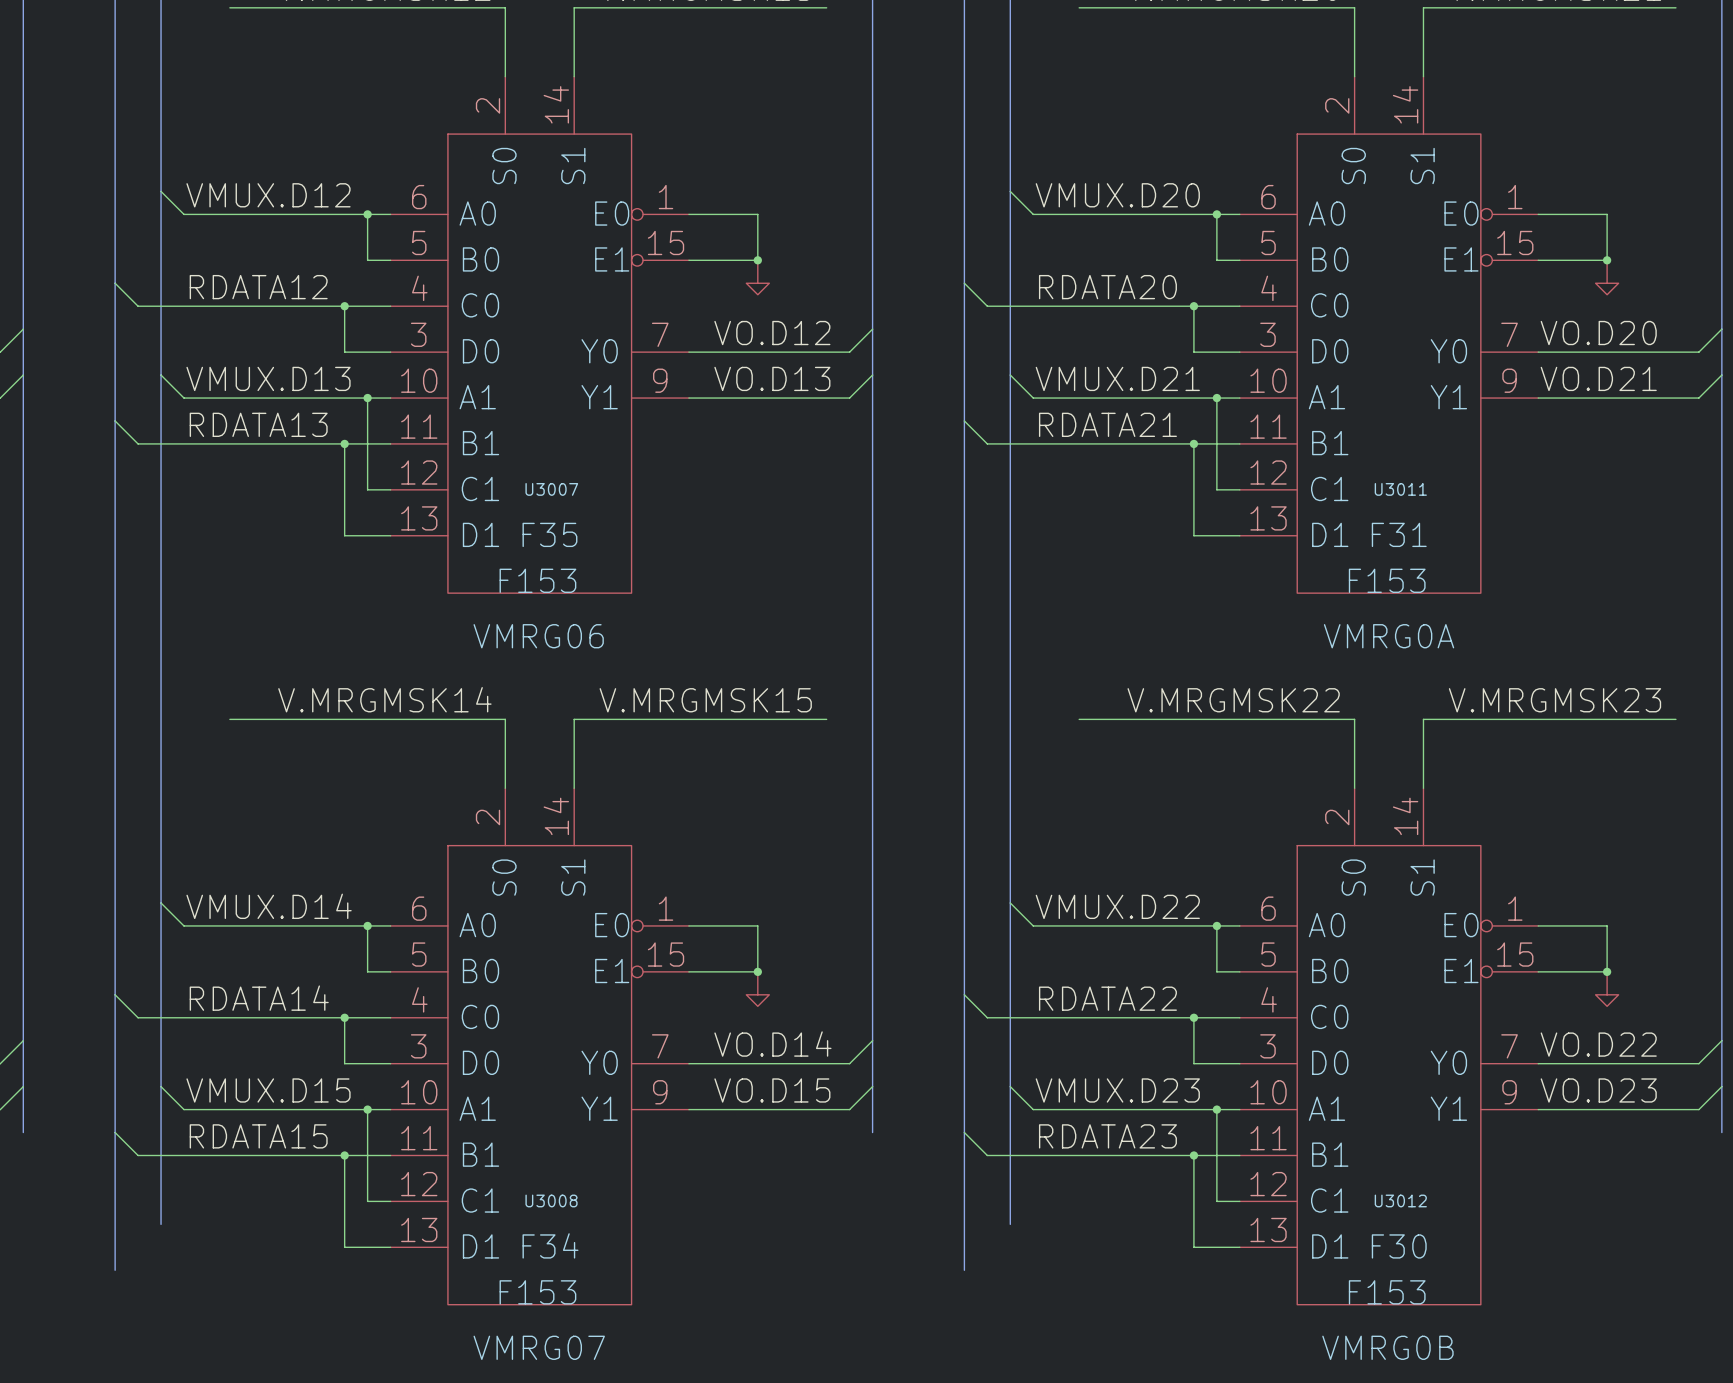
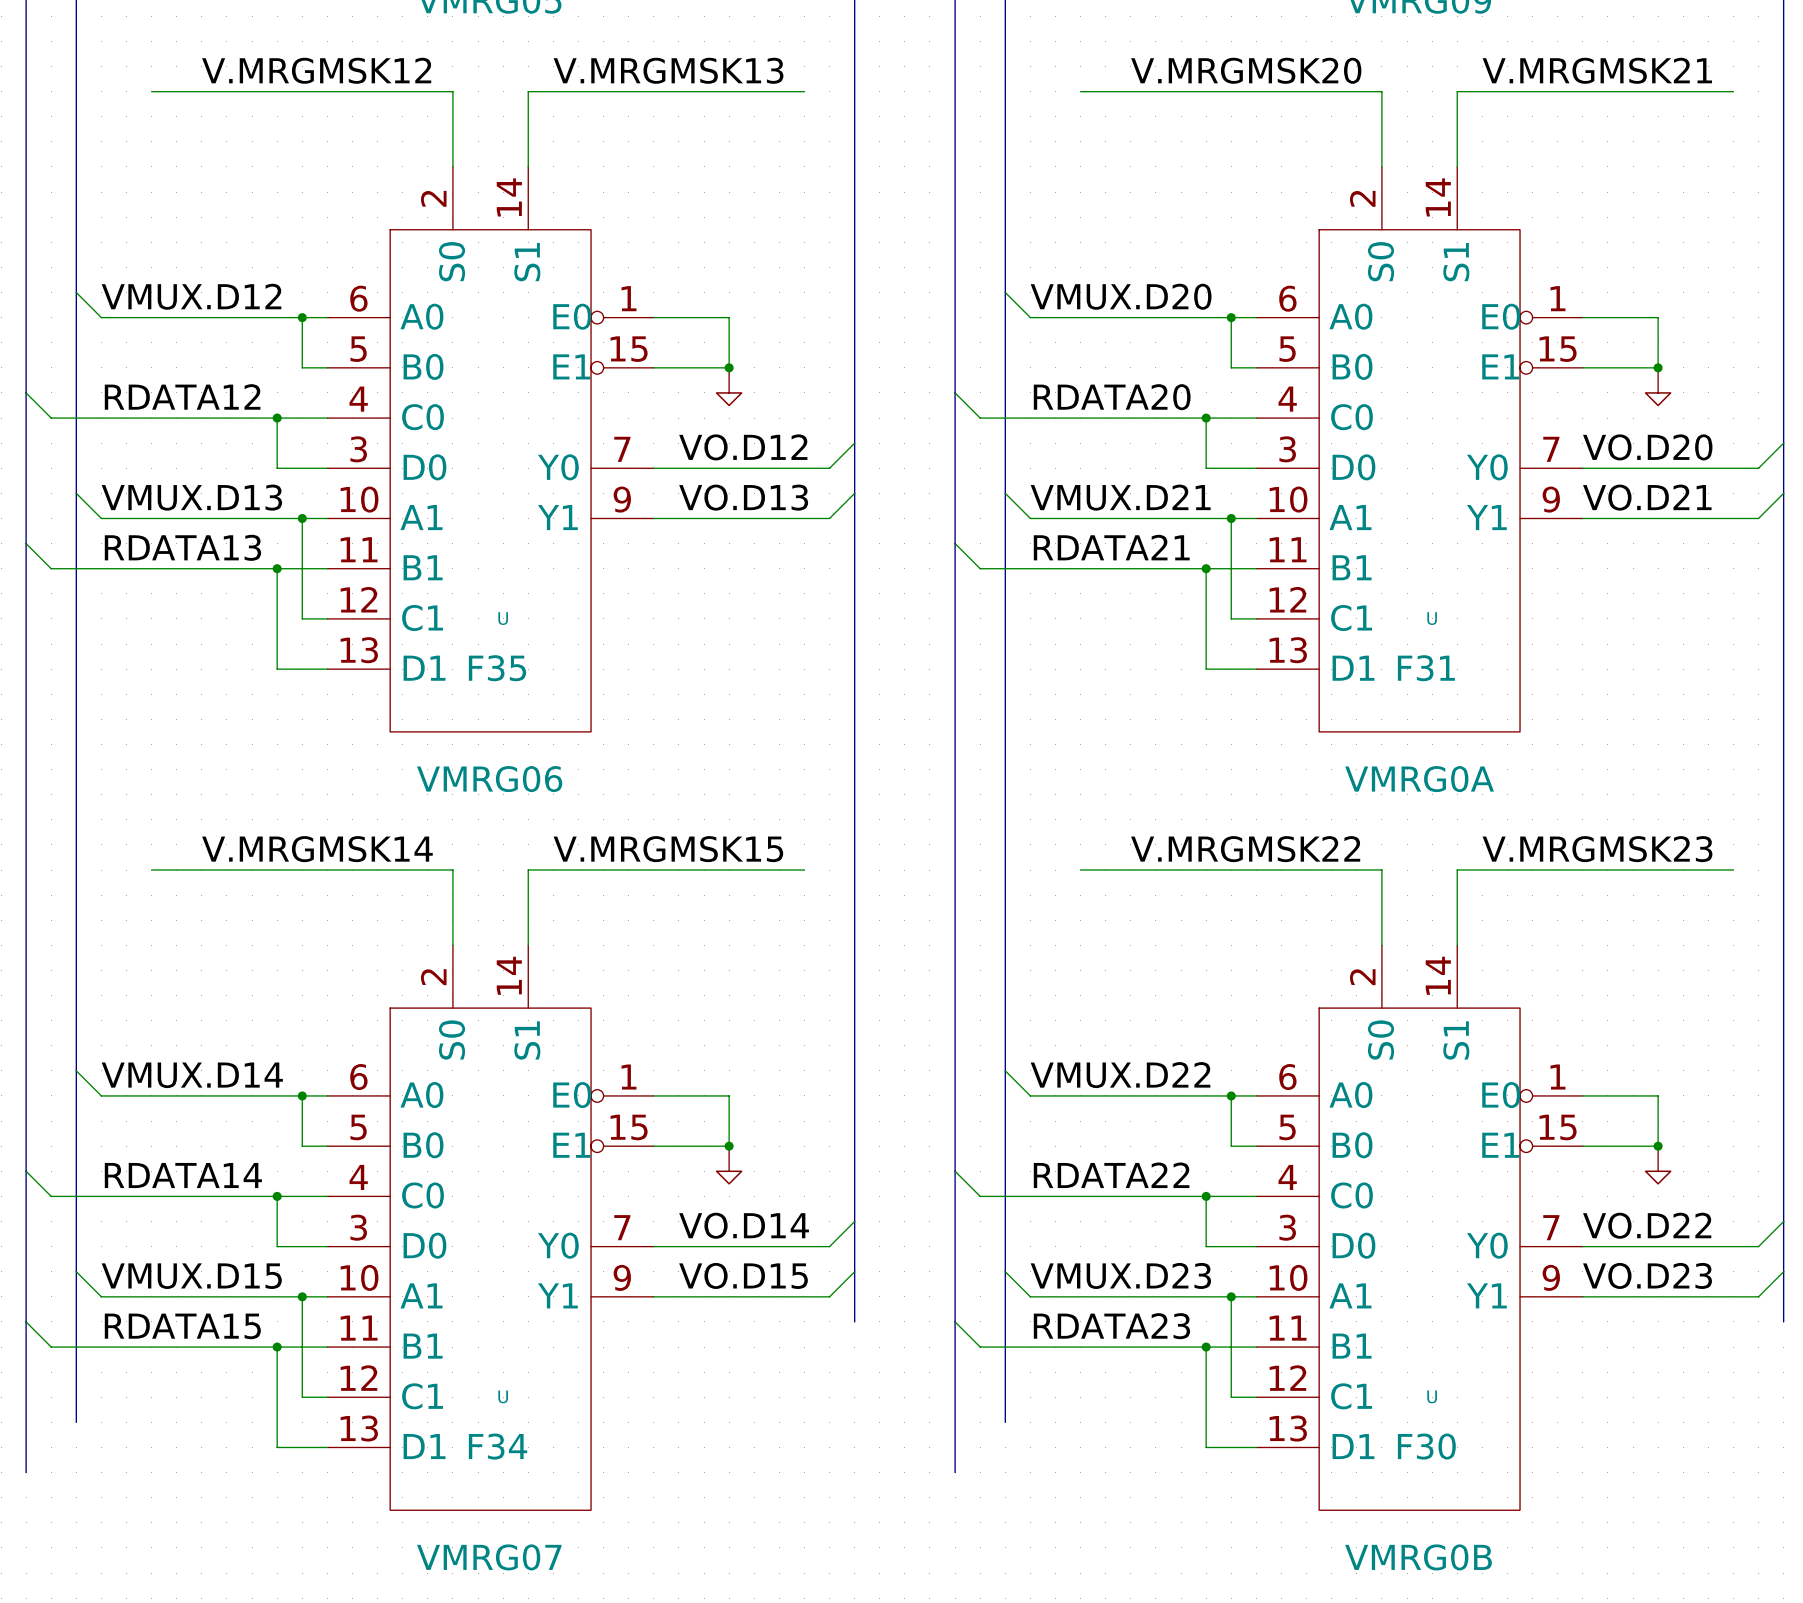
U3007 name: U3007 (551, 489) -> U (503, 618)
U3011 name: U3011 (1400, 489) -> U (1432, 618)
U3007 value: F153 (537, 580) -> none
U3011 value: F153 (1387, 580) -> none
U3008 name: U3008 (551, 1200) -> U (503, 1396)
U3012 name: U3012 (1400, 1200) -> U (1432, 1396)
U3008 value: F153 (537, 1292) -> none
U3012 value: F153 (1387, 1292) -> none

